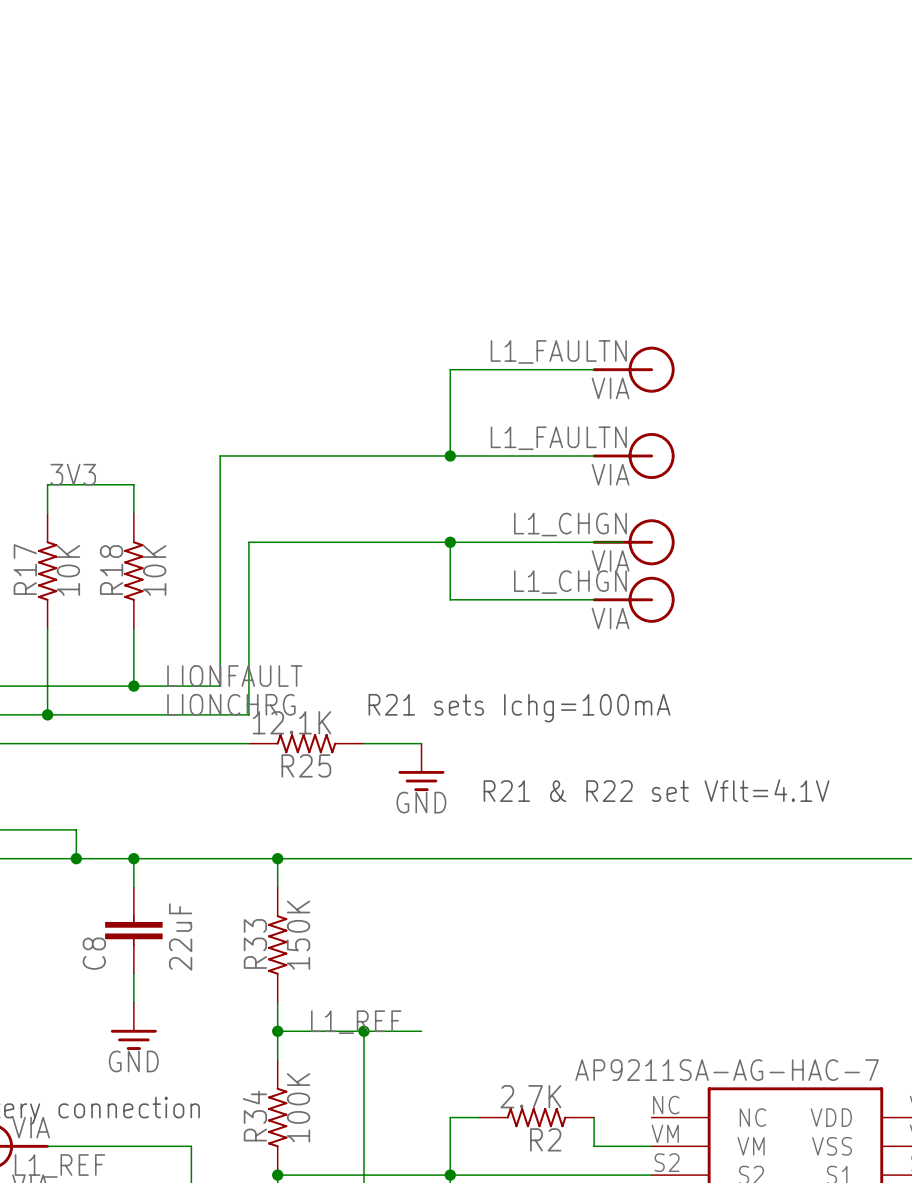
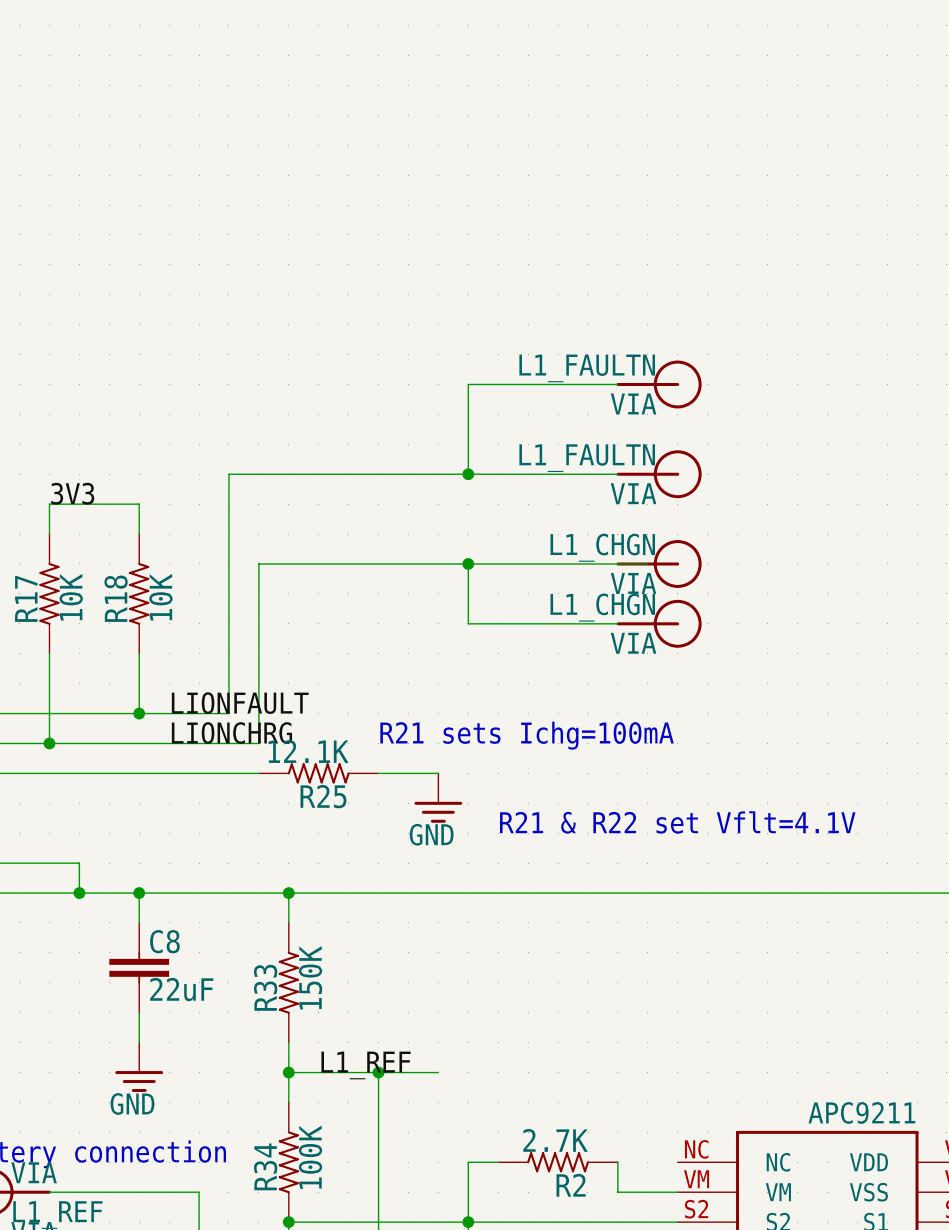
C8 value rotation: 0° (180, 937) -> 90° clockwise (181, 989)
C8 name rotation: 0° (94, 953) -> 90° clockwise (164, 941)
C8 name position: C8 (94, 953) -> C8 (164, 941)
part value: AP9211SA-AG-HAC-7 (727, 1070) -> APC9211 (861, 1112)

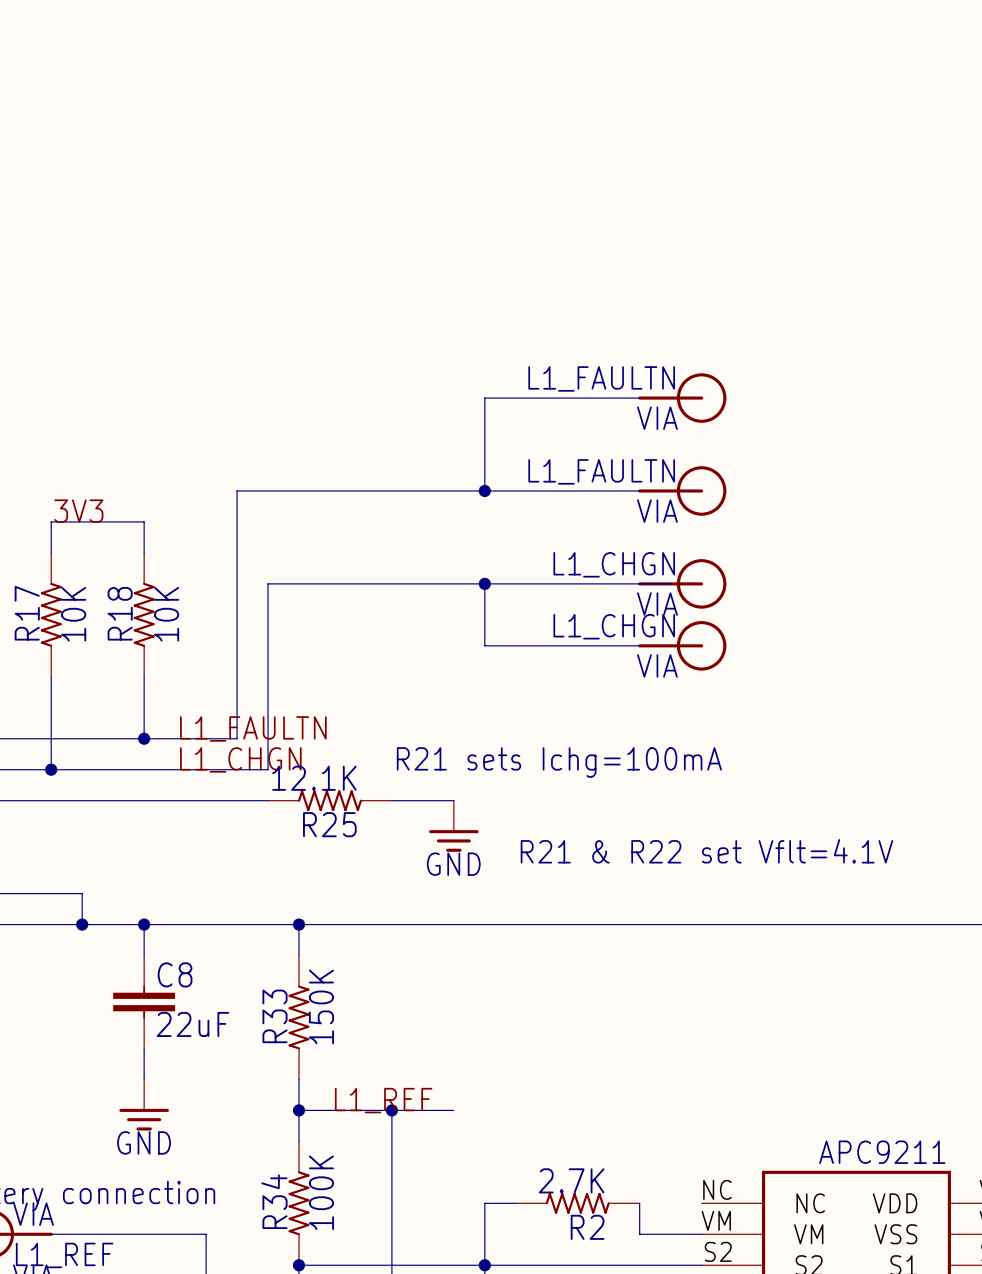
label: LIONFAULT (240, 703) -> L1_FAULTN (253, 728)
label: LIONCHRG (231, 733) -> L1_CHGN (240, 759)

